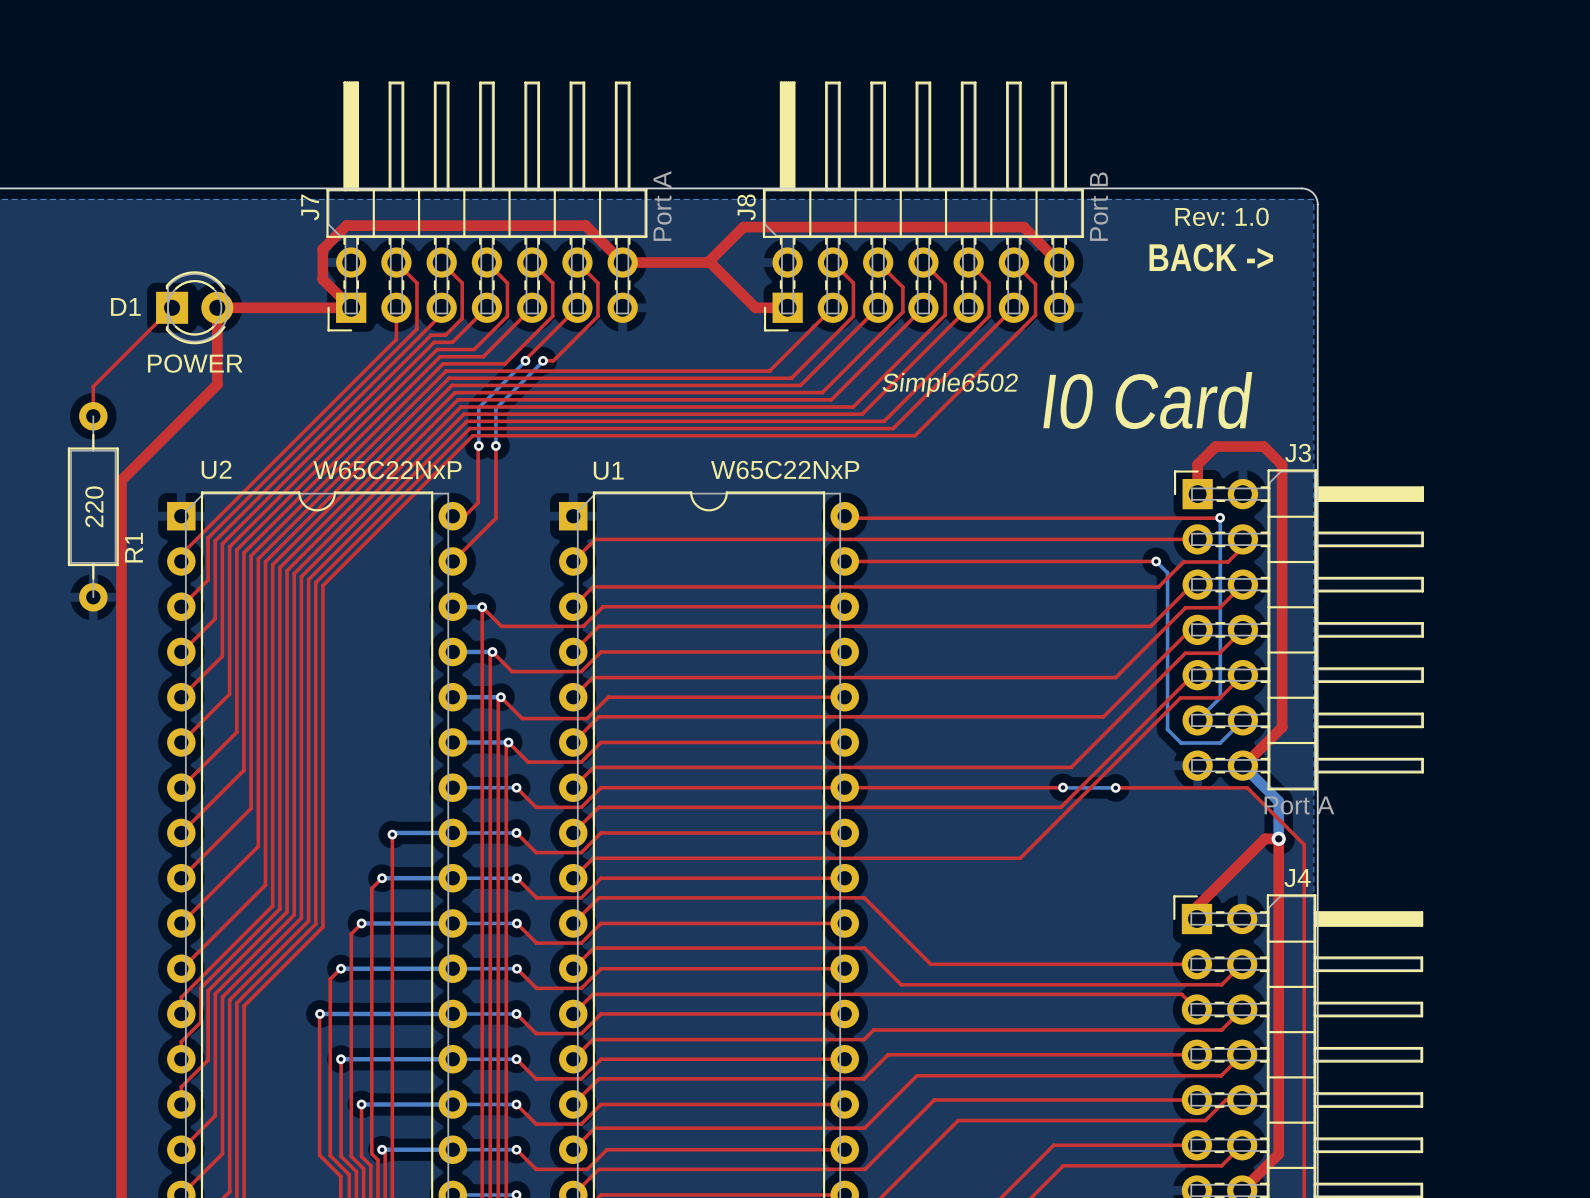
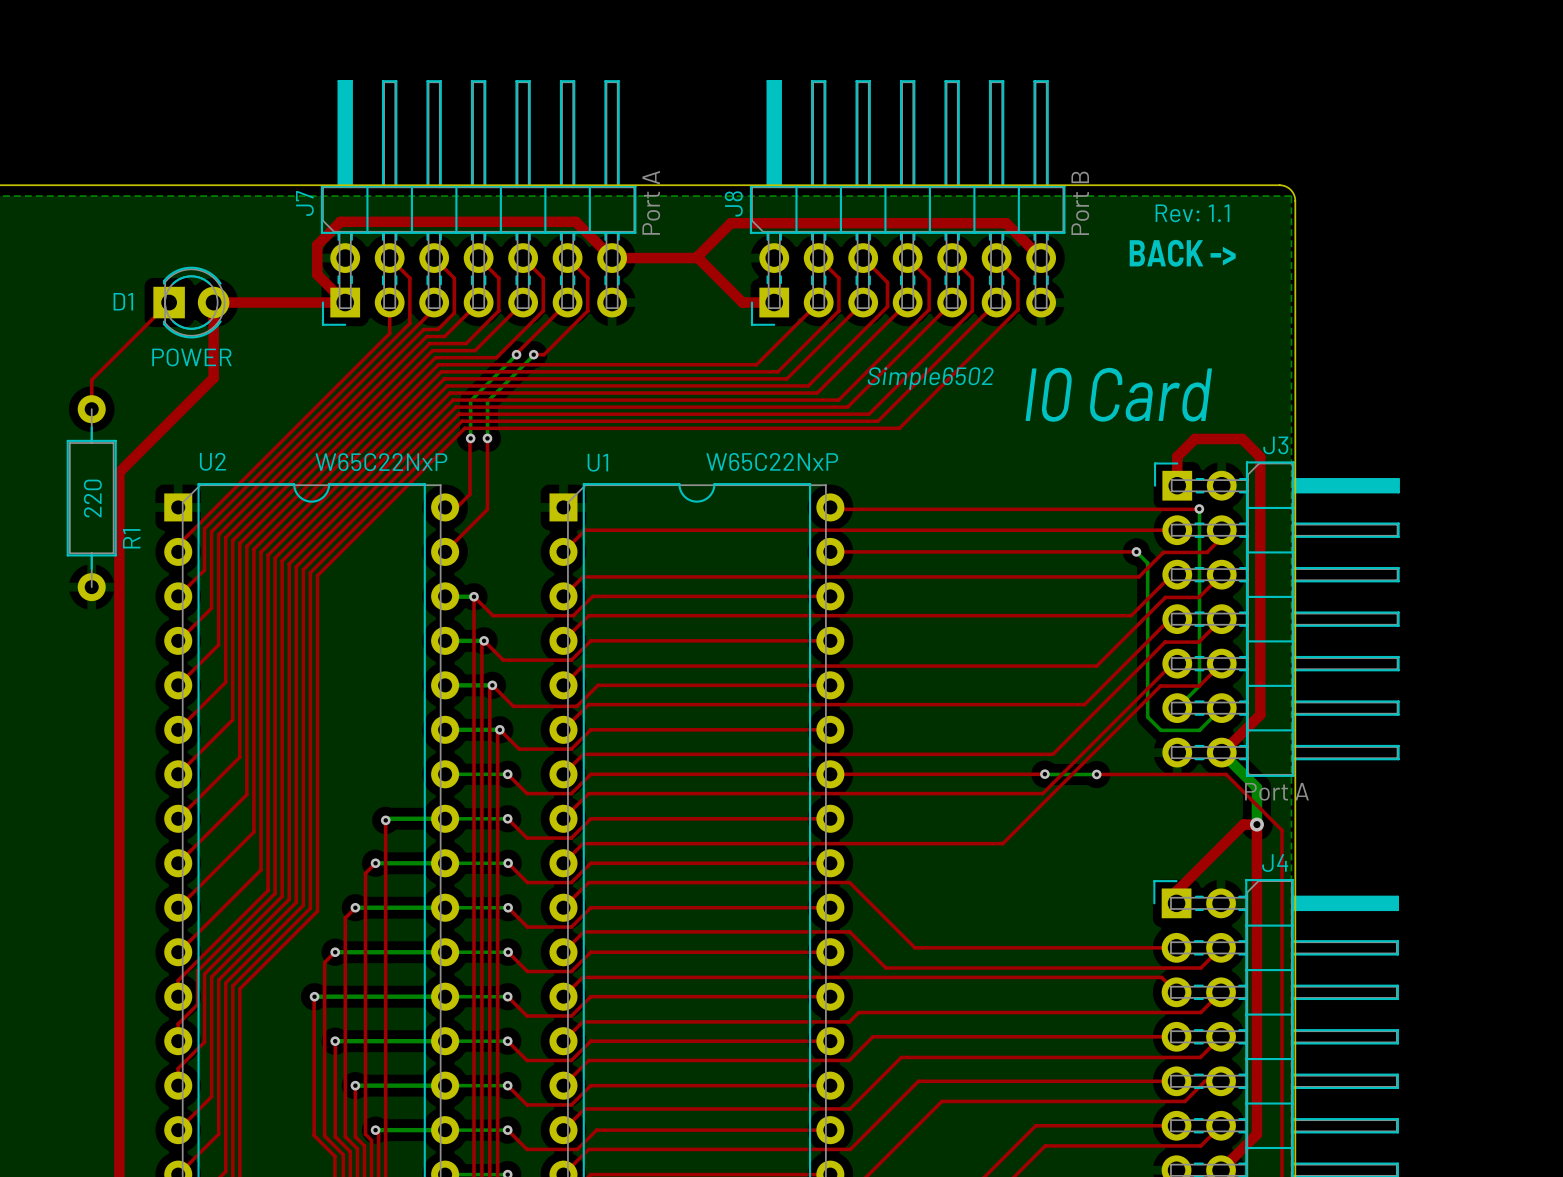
text: Rev: 1.0 (1222, 216) -> Rev: 1.1 (1192, 213)

